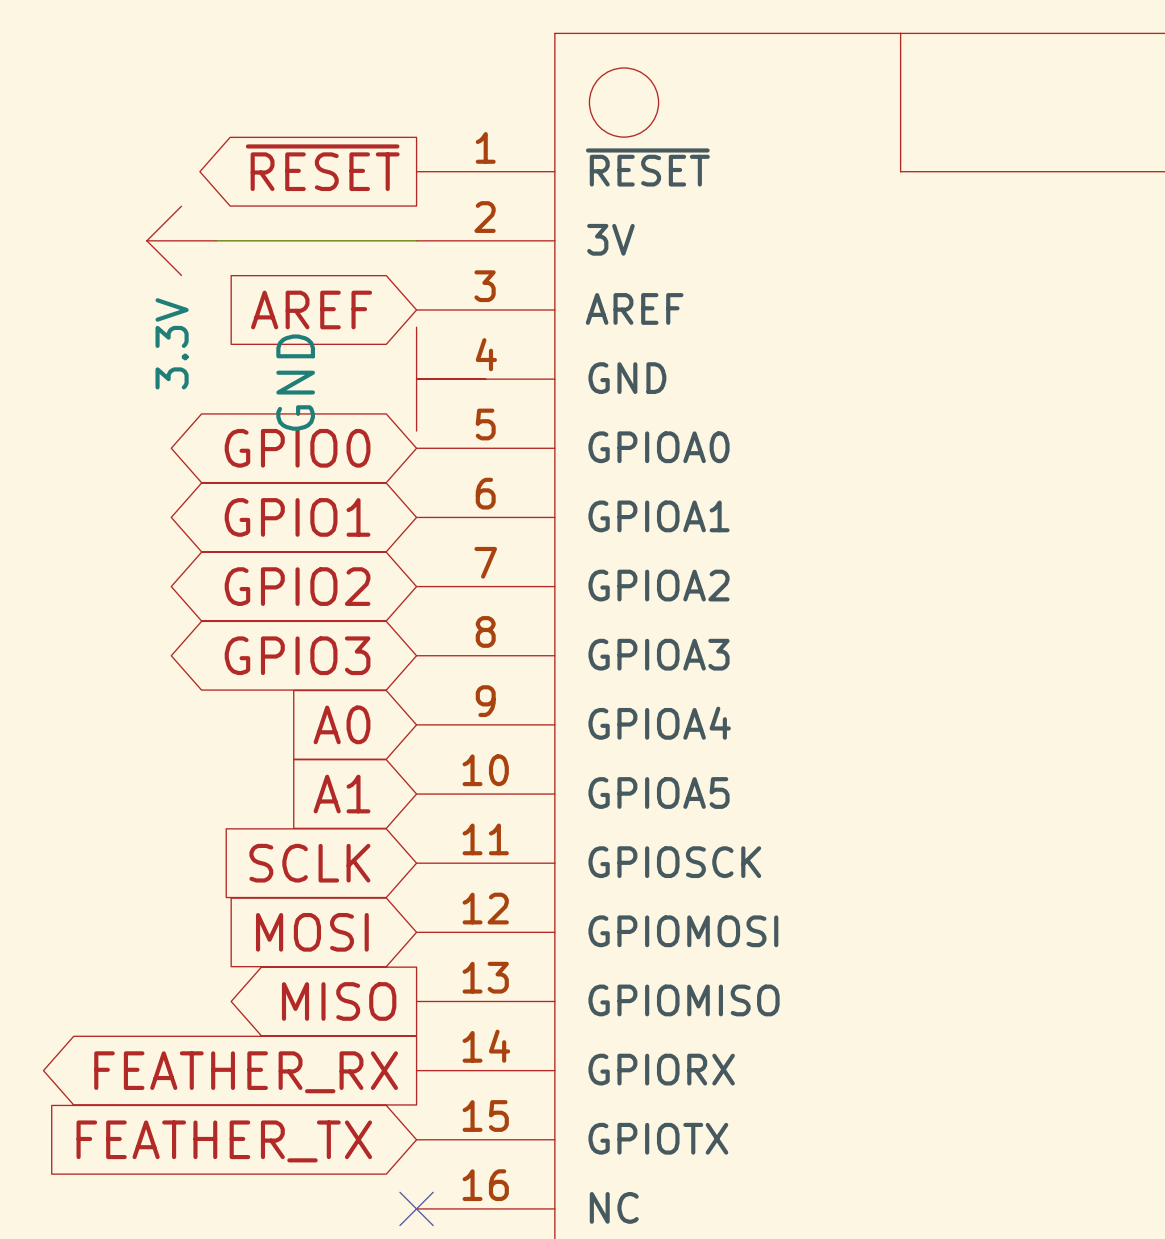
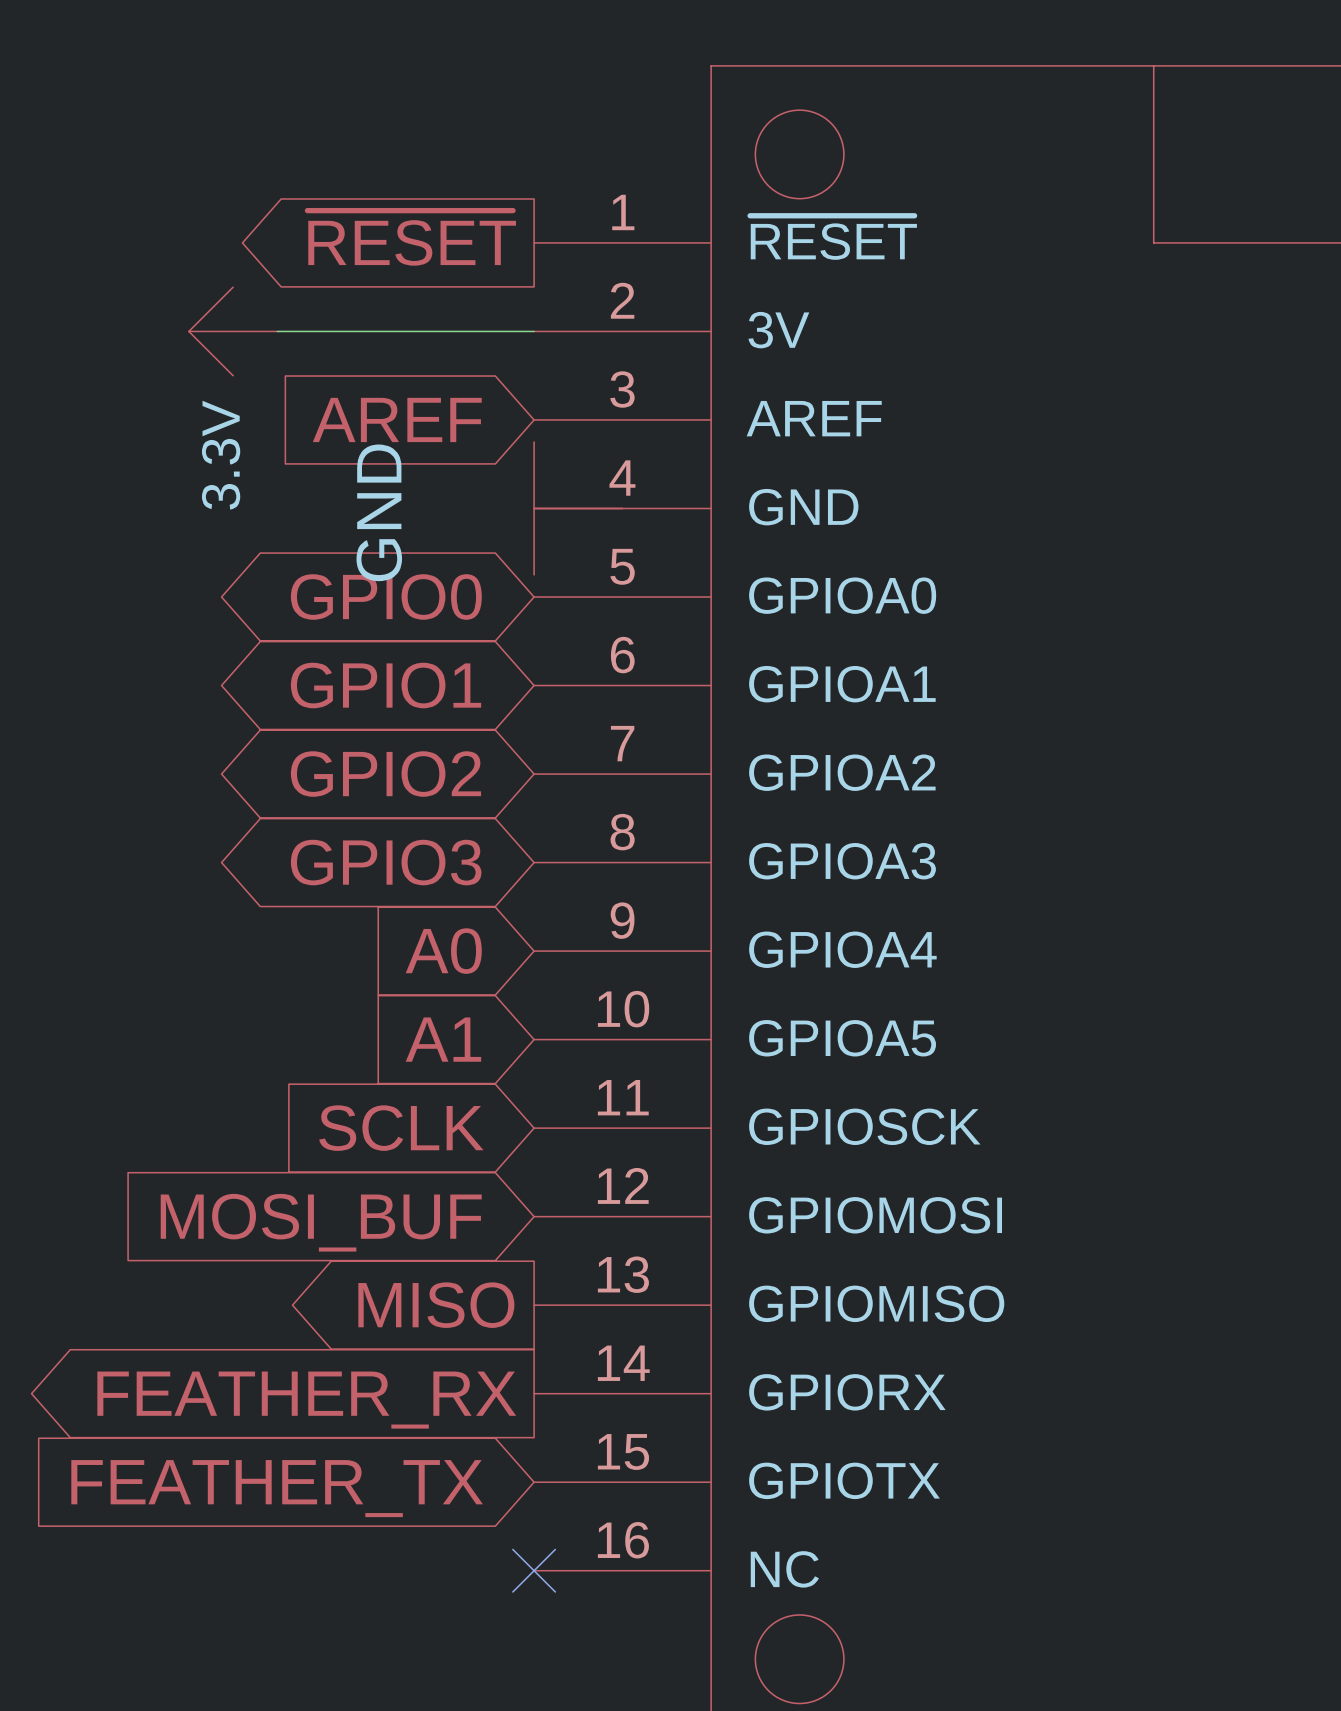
global label: MOSI (312, 932) -> MOSI_BUF (321, 1222)

